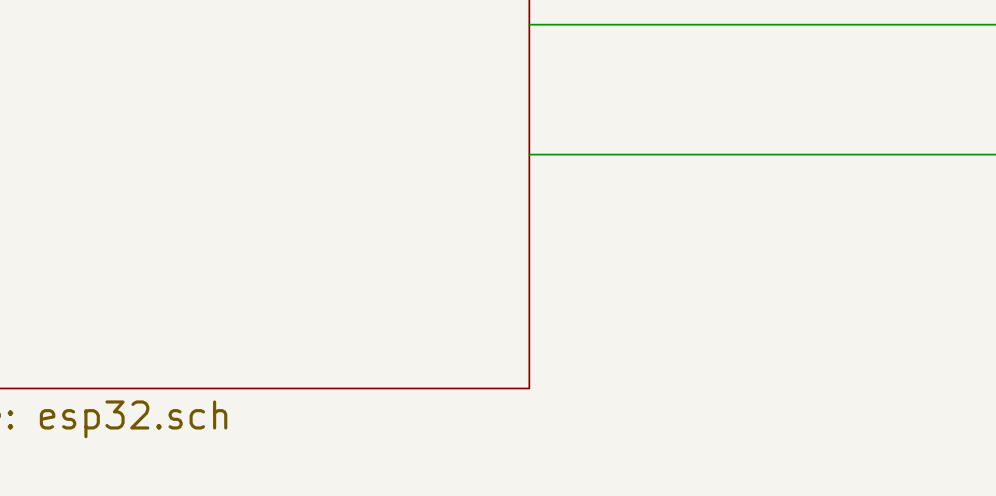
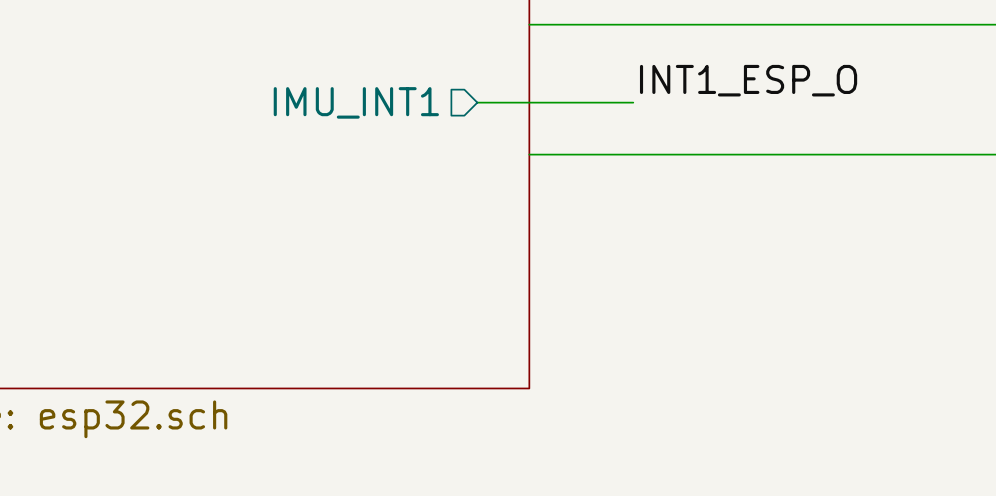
label: none -> INT1_ESP_O (748, 80)
sheet pin: none -> IMU_INT1 (356, 102)
wire: none -> (477, 102) (633, 102)

